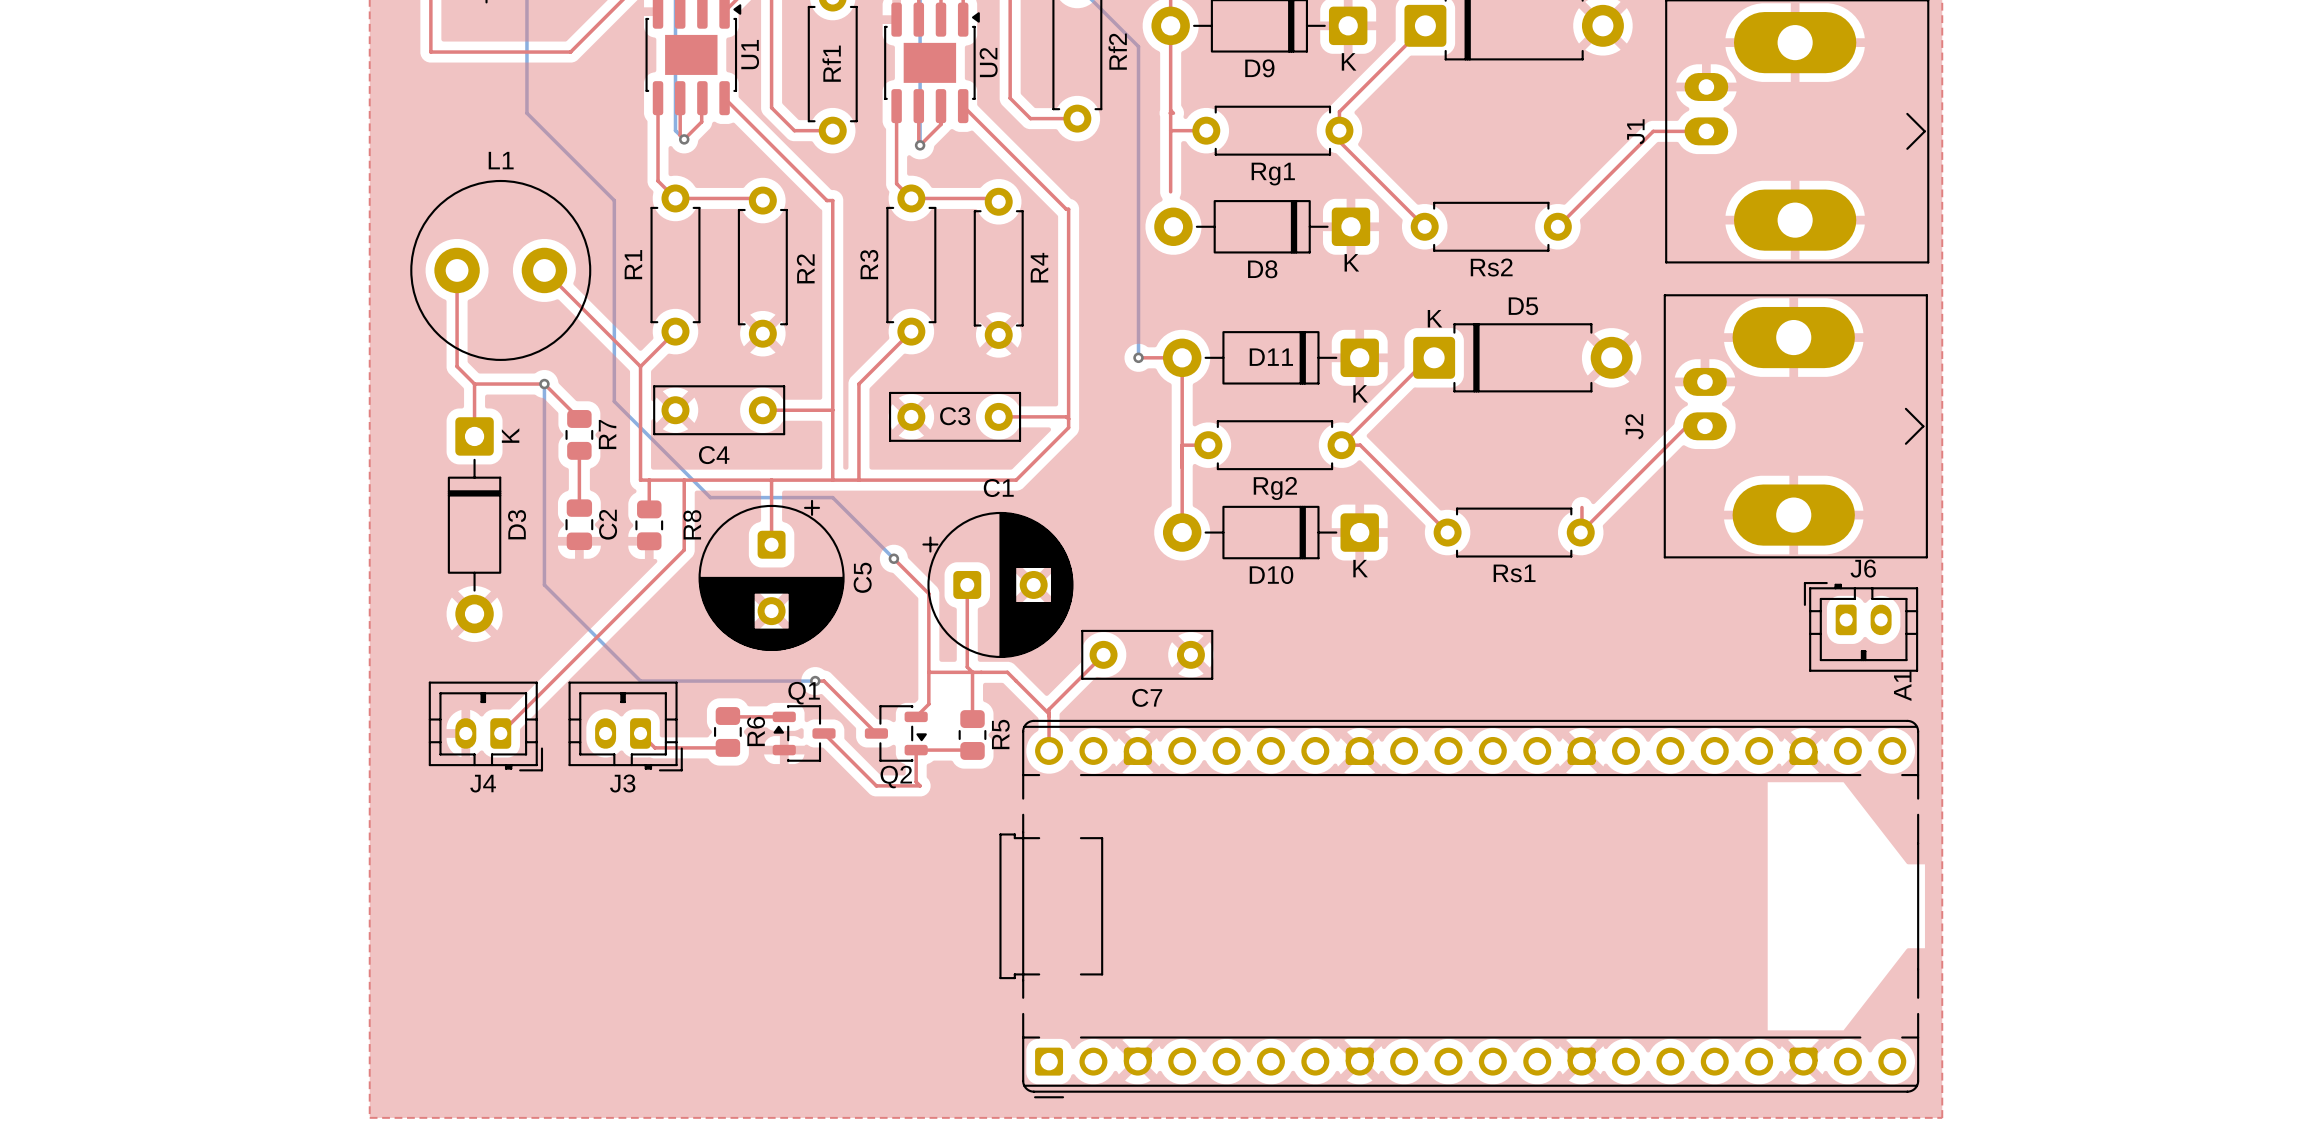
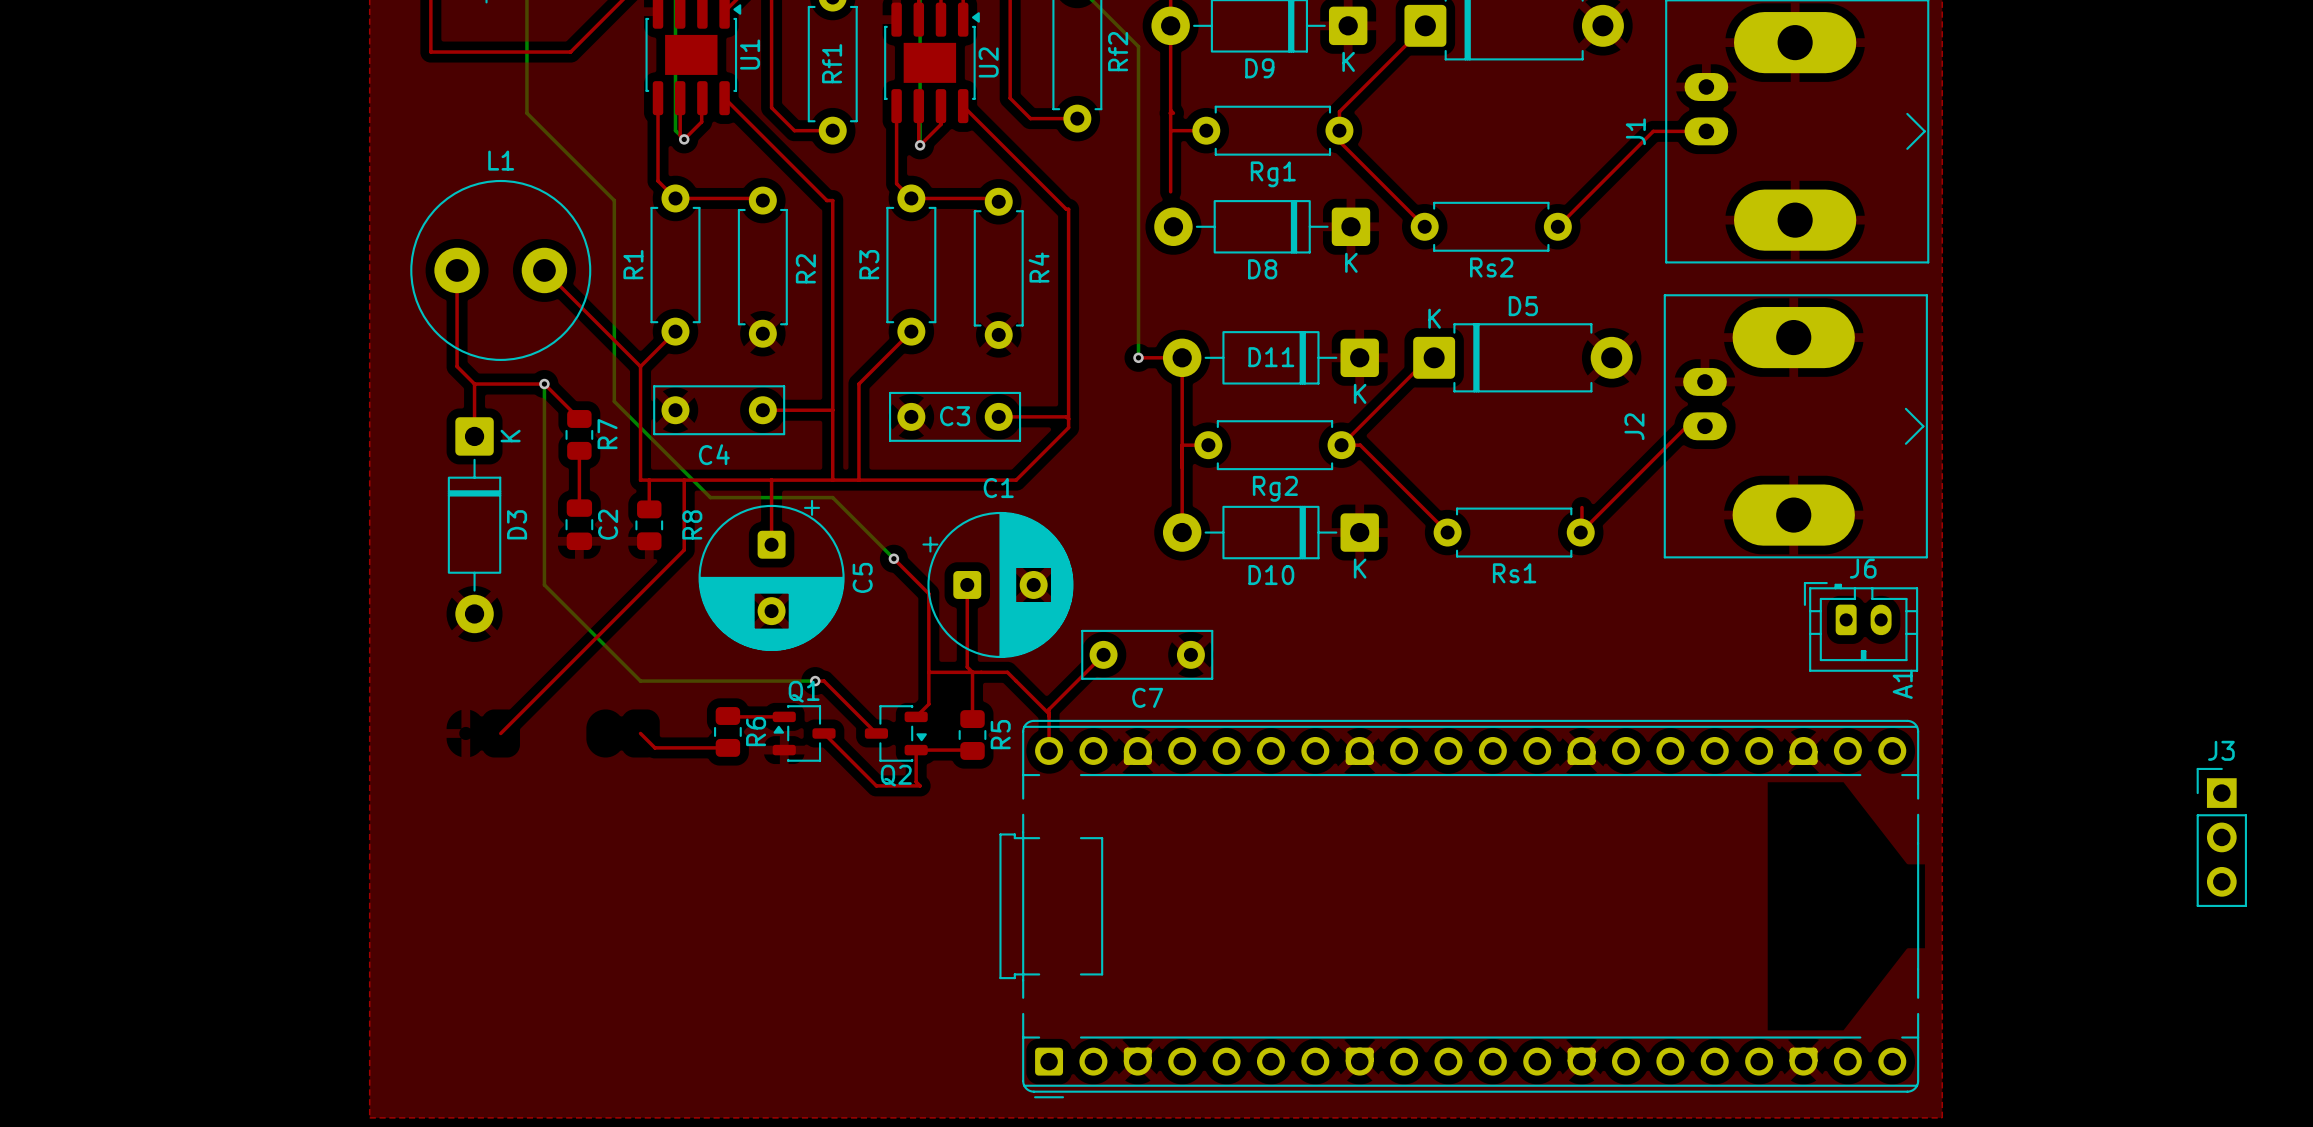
J3 footprint: [568, 681, 683, 772] -> [2196, 767, 2247, 907]
J4: (485, 726) -> none
J3 name position: J3 (622, 783) -> J3 (2221, 750)

